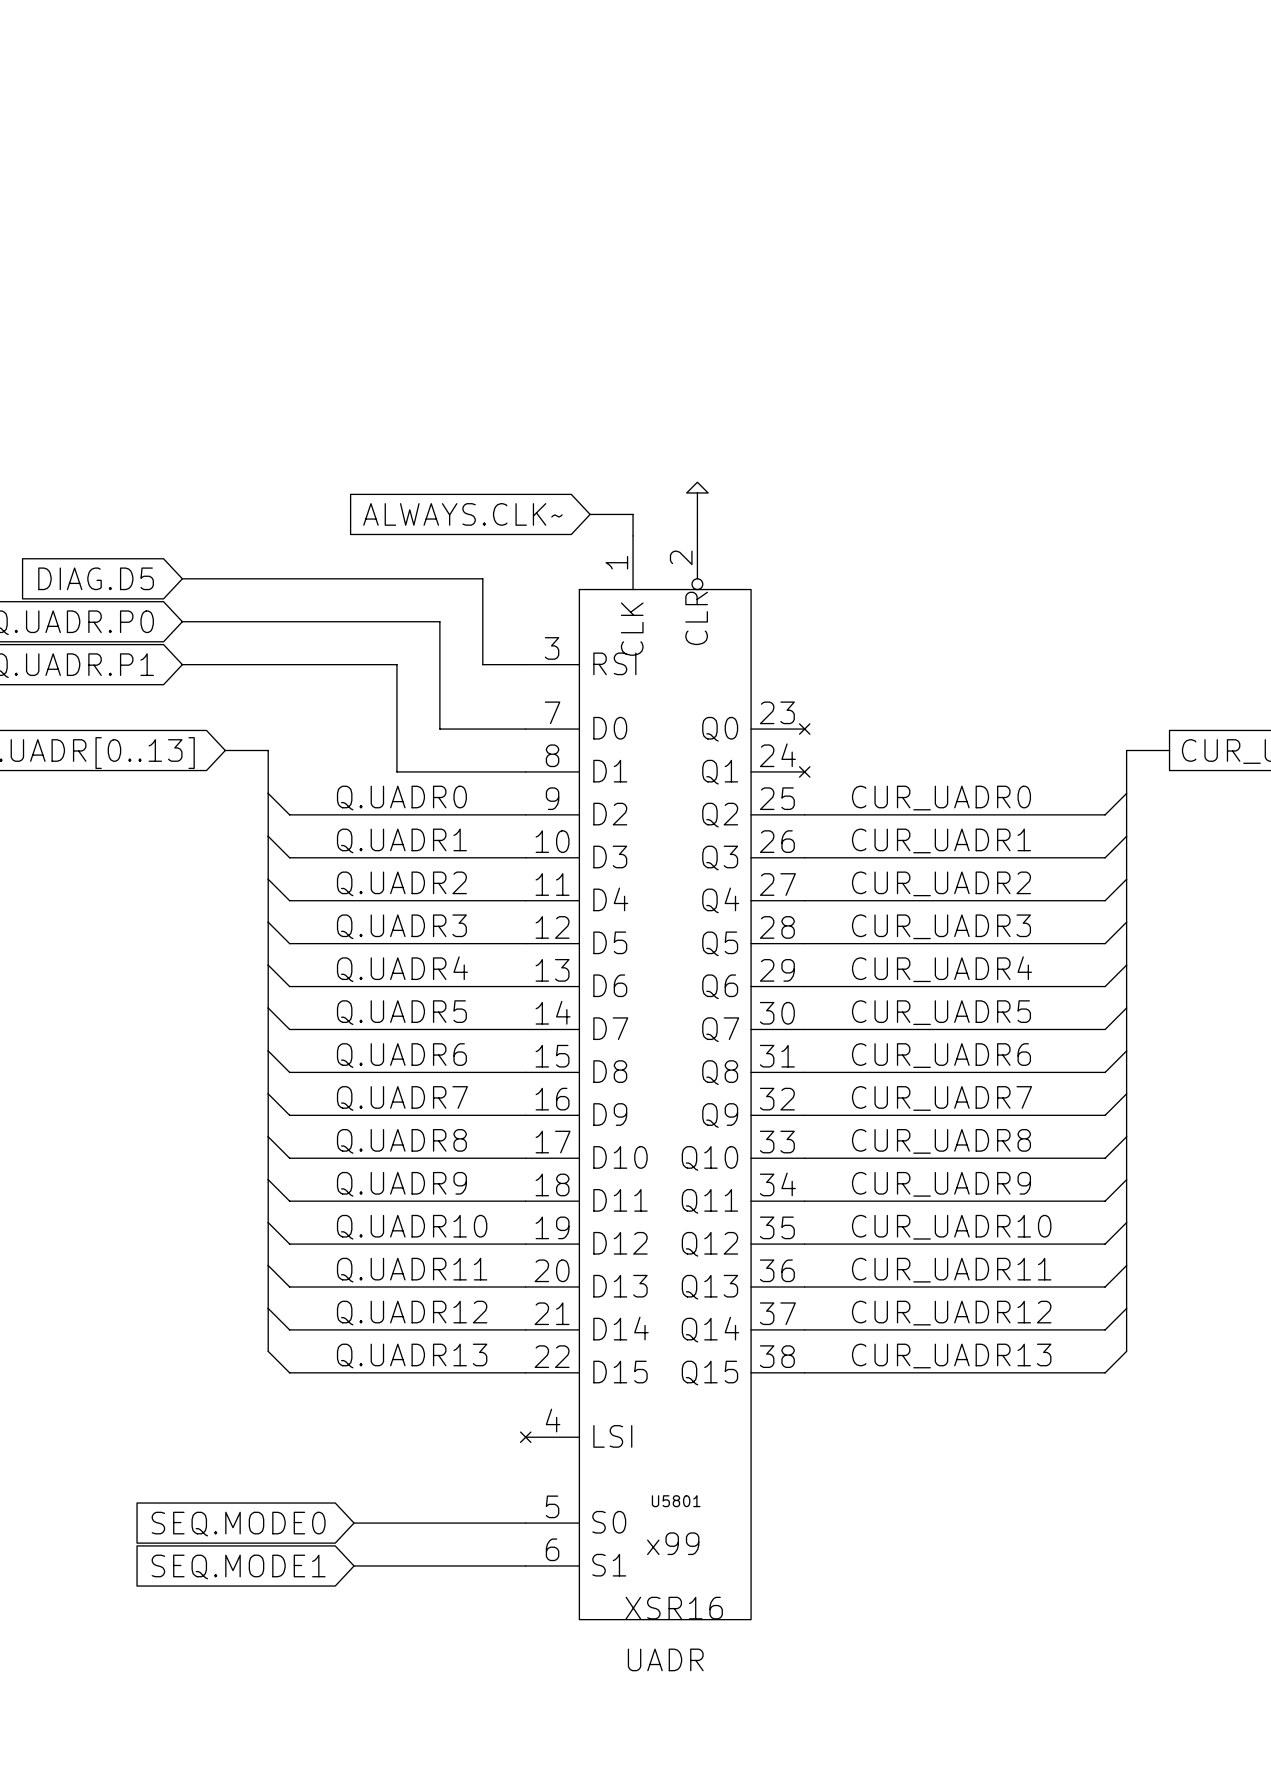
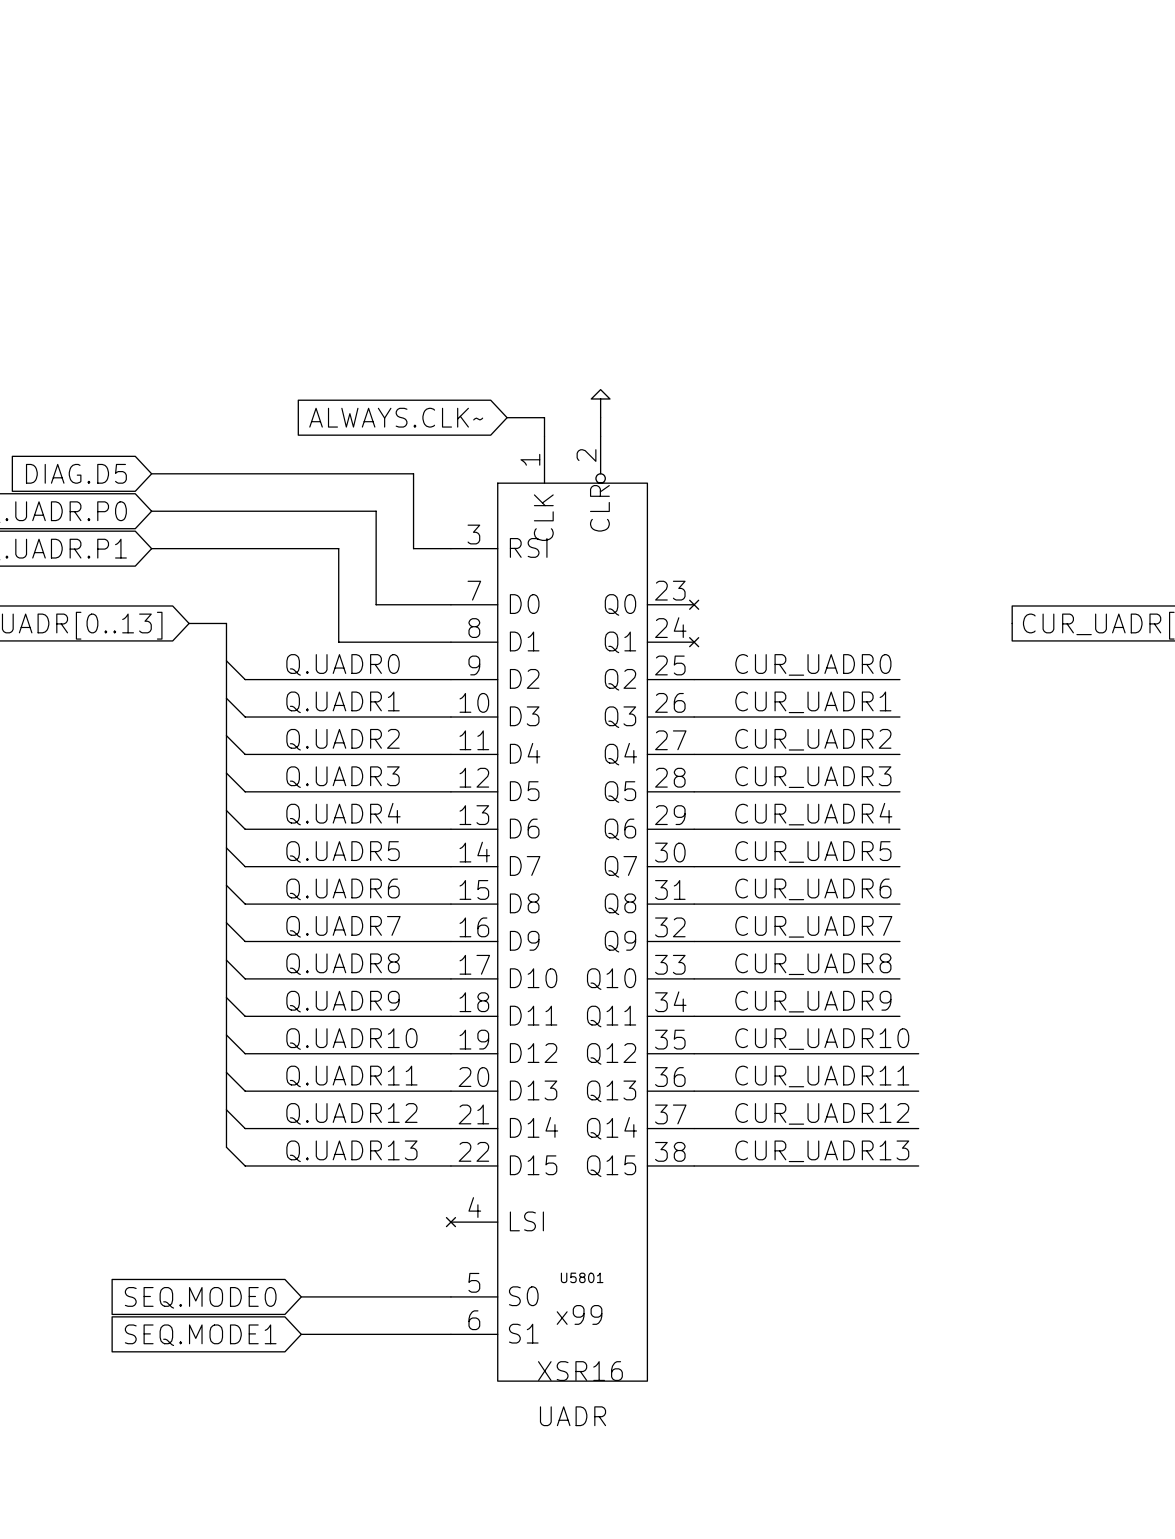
bus: (1169, 750) (1126, 750) (1126, 1351) -> none
wire: (1126, 793) (1105, 814) (1040, 814) -> none
wire: (1126, 836) (1105, 857) (1040, 857) -> none
wire: (1126, 879) (1105, 900) (1040, 900) -> none
wire: (1126, 922) (1105, 943) (1040, 943) -> none
wire: (1126, 965) (1105, 986) (1040, 986) -> none
wire: (1126, 1008) (1105, 1029) (1040, 1029) -> none
wire: (1126, 1050) (1105, 1072) (1040, 1072) -> none
wire: (1126, 1093) (1105, 1115) (1040, 1115) -> none
wire: (1126, 1136) (1105, 1158) (1040, 1158) -> none
wire: (1126, 1179) (1105, 1201) (1040, 1201) -> none
wire: (1126, 1222) (1105, 1244) (1062, 1244) -> none
wire: (1126, 1265) (1105, 1287) (1062, 1287) -> none
wire: (1126, 1308) (1105, 1329) (1062, 1329) -> none
wire: (1126, 1351) (1105, 1372) (1062, 1372) -> none

